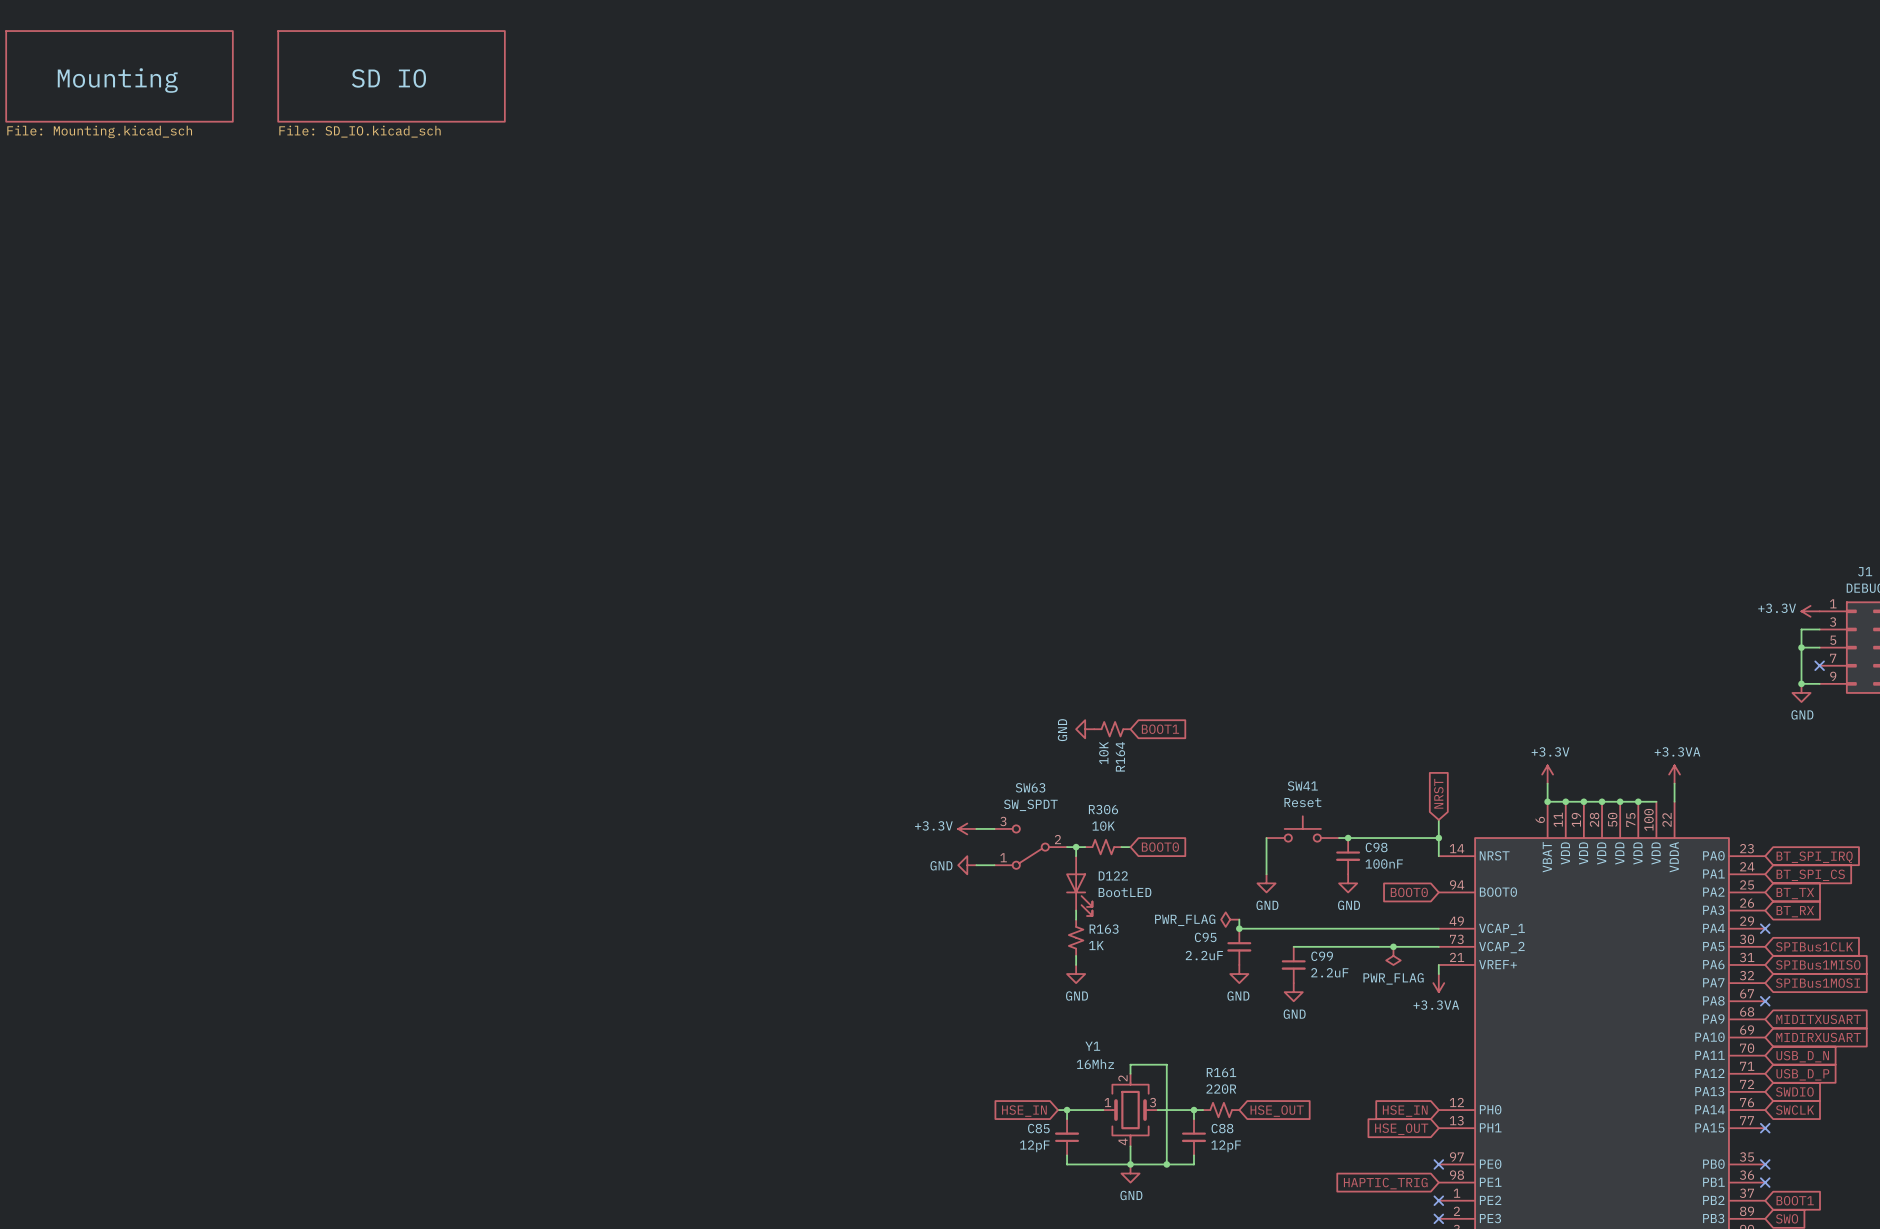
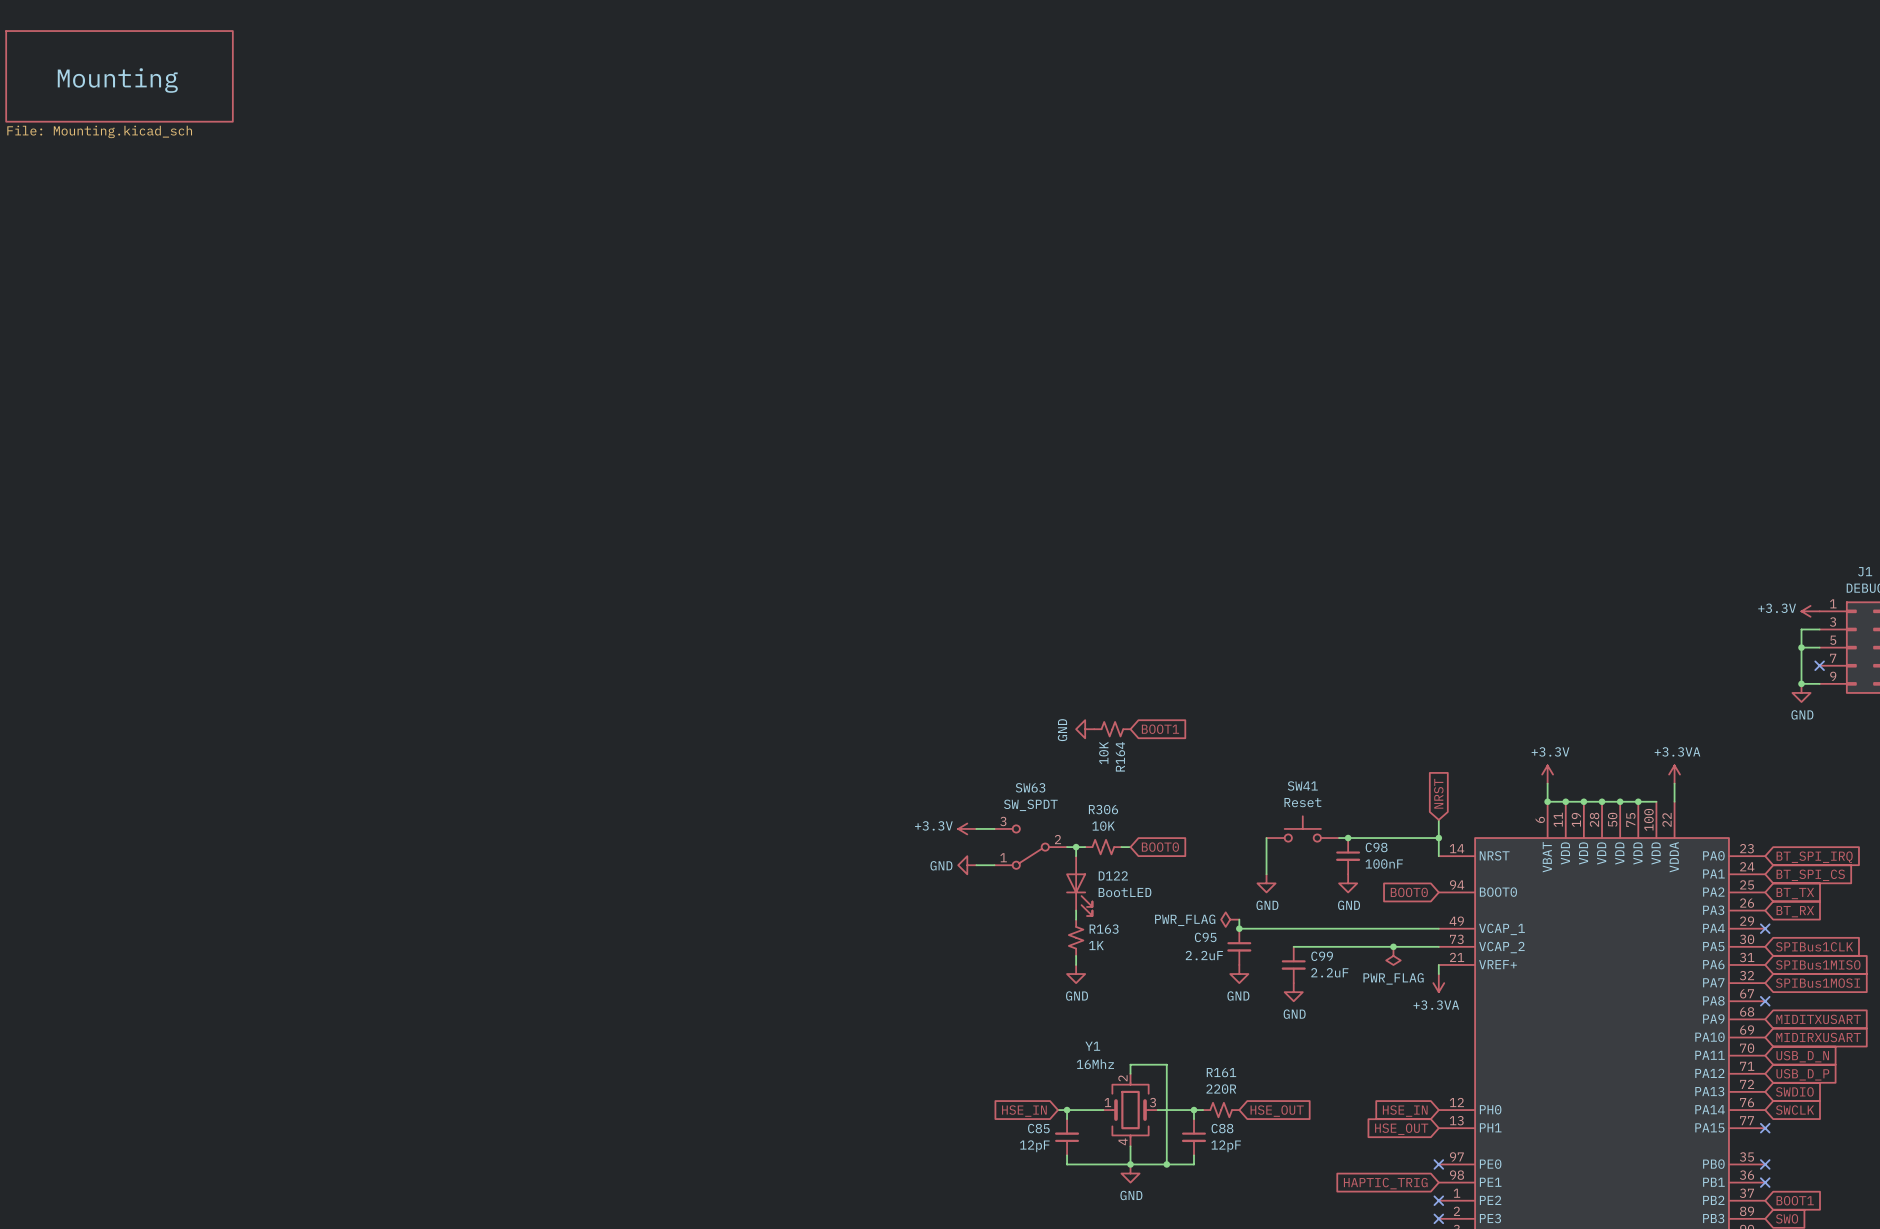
sheet SD IO: File: SD_IO.kicad_sch (391, 76) -> none

